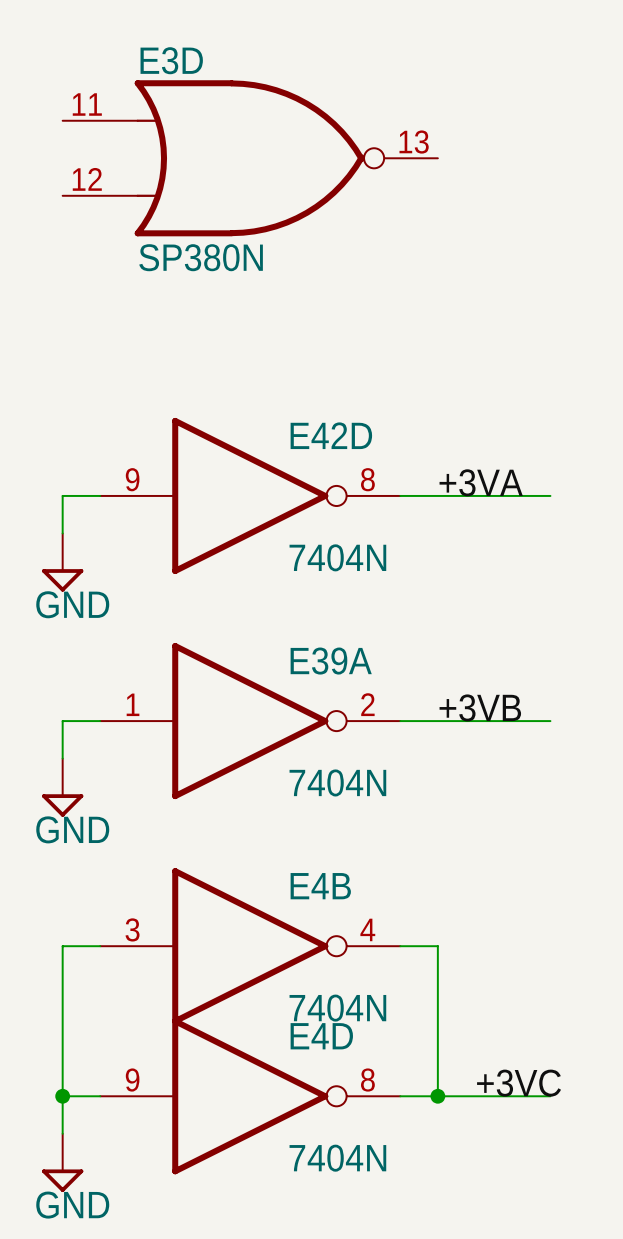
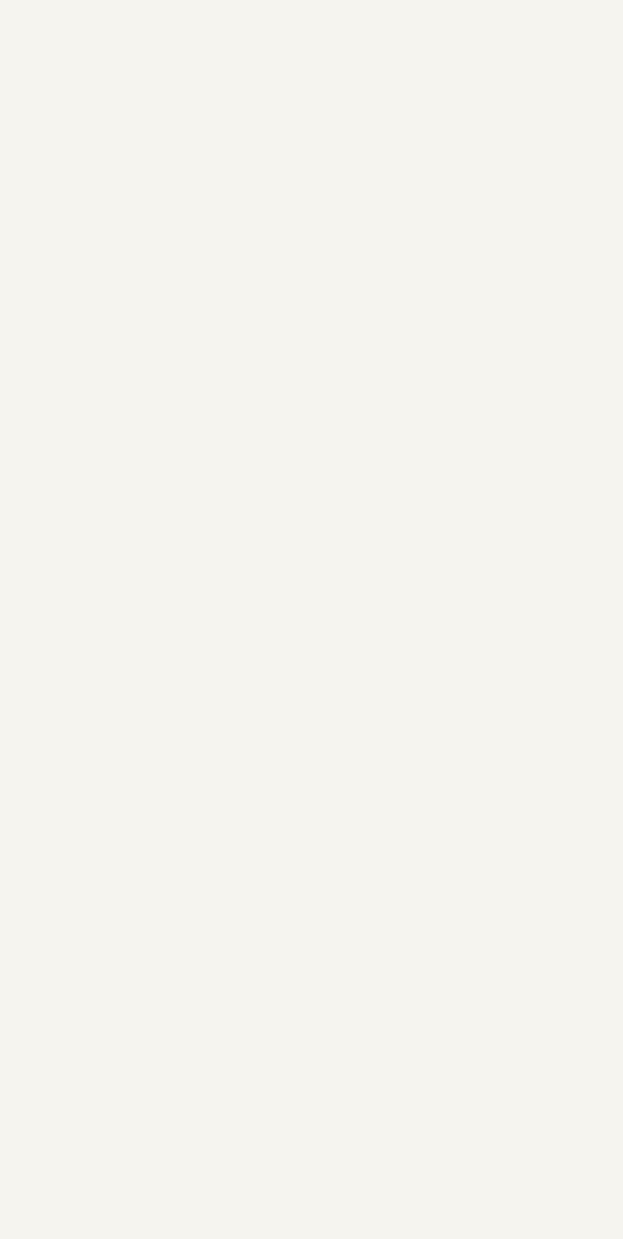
E3D: SP380N (250, 158) -> none
label: +3VA (481, 482) -> none
wire: (100, 495) (62, 495) (62, 533) -> none
E42D: 7404N (250, 495) -> none
wire: (400, 495) (550, 495) -> none
power symbol: GND (62, 562) -> none
label: +3VB (480, 707) -> none
wire: (100, 721) (62, 721) (62, 758) -> none
E39A: 7404N (250, 721) -> none
wire: (400, 721) (550, 721) -> none
power symbol: GND (62, 787) -> none
wire: (100, 946) (62, 946) (62, 1133) -> none
E4B: 7404N (250, 946) -> none
wire: (400, 946) (437, 946) (437, 1096) -> none
label: +3VC (519, 1083) -> none
wire: (62, 1096) (100, 1096) -> none
junction: (62, 1096) -> none
E4D: 7404N (250, 1096) -> none
wire: (400, 1096) (550, 1096) -> none
junction: (437, 1096) -> none
power symbol: GND (62, 1162) -> none

